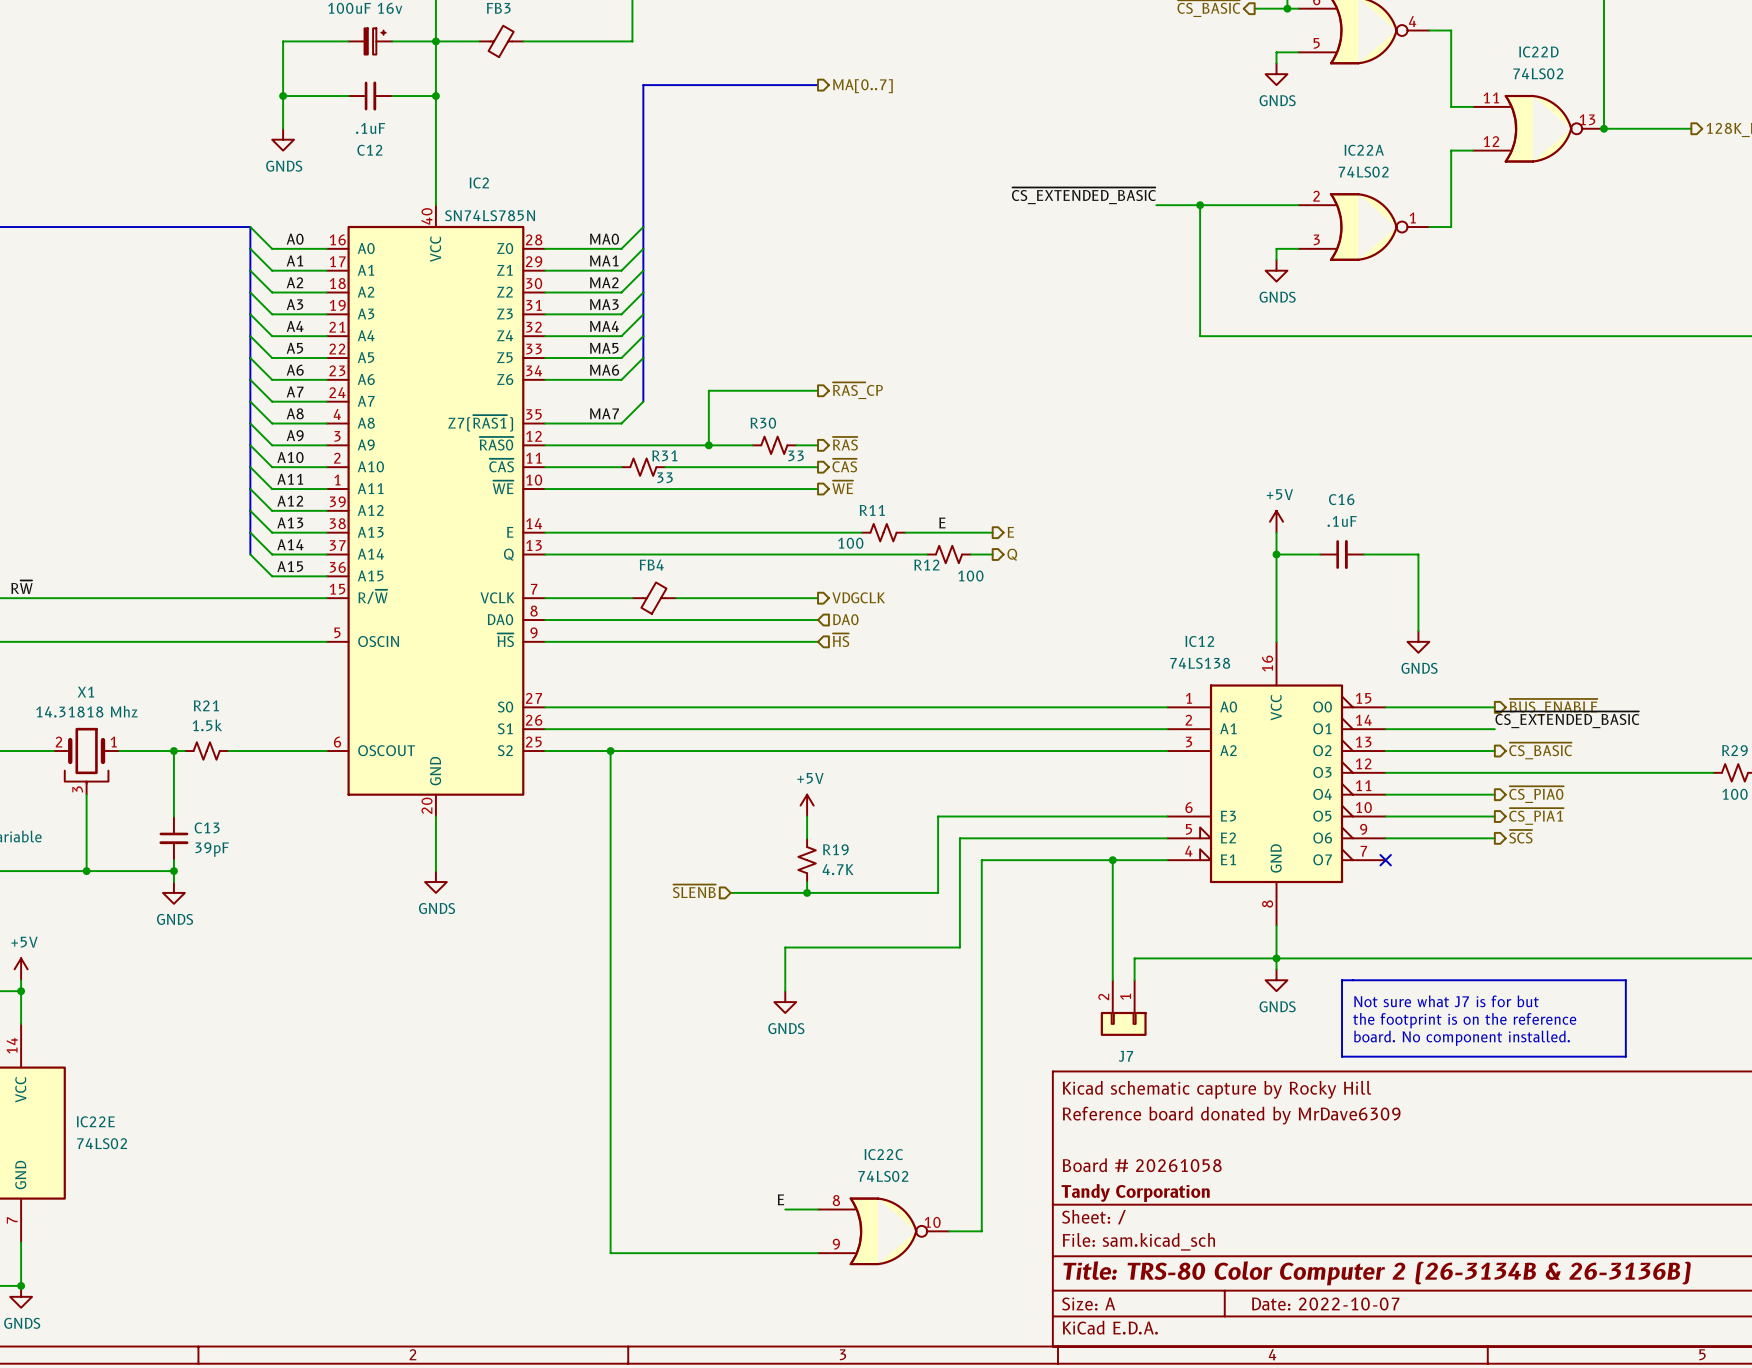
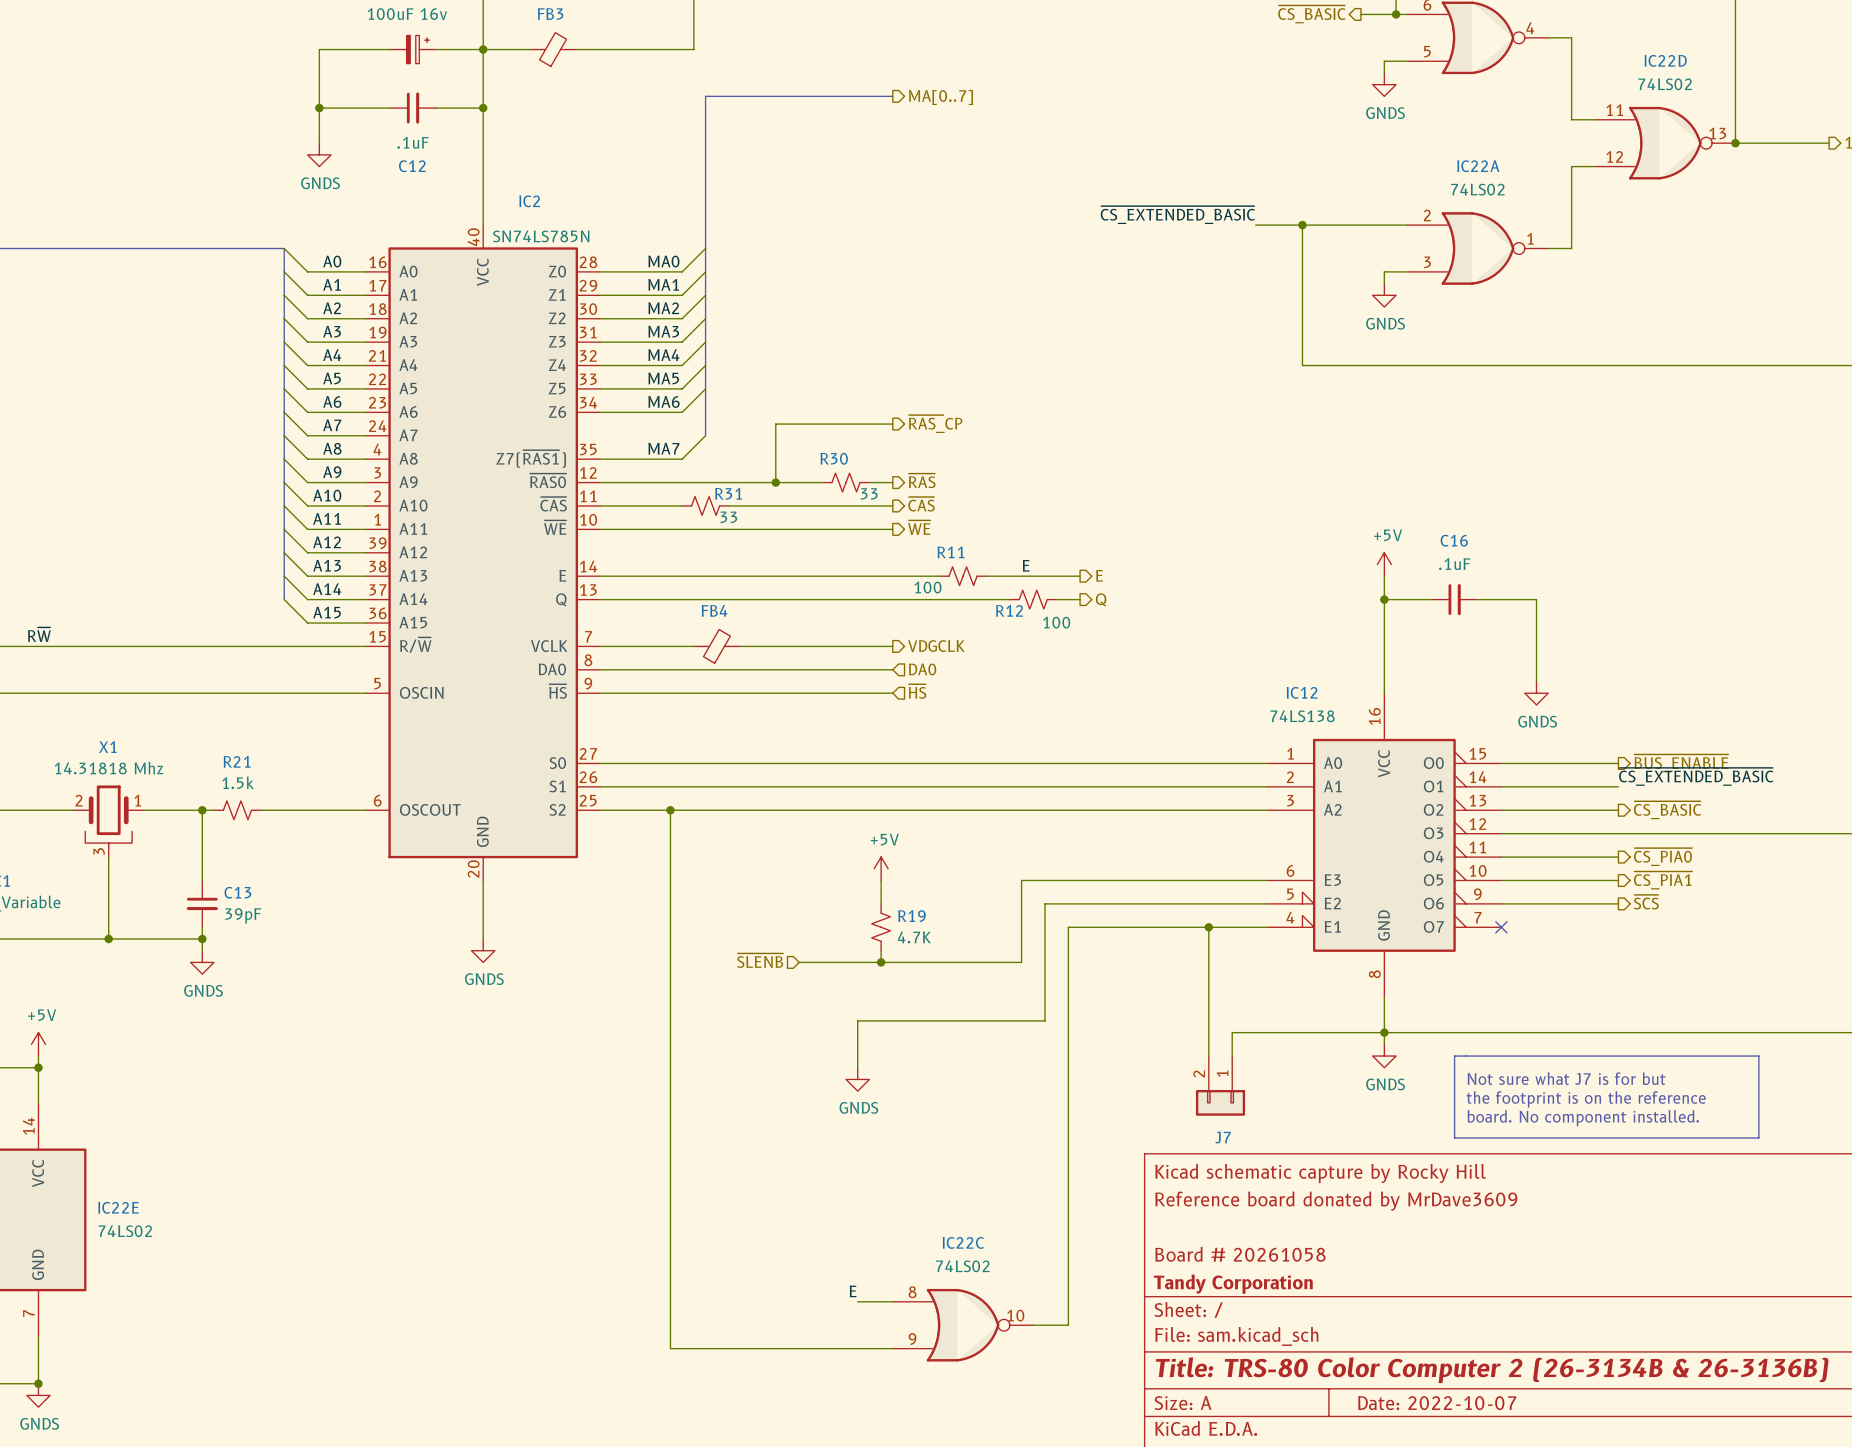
title block: Reference board donated by MrDave6309 (1231, 1115) -> Reference board donated by MrDave3609 (1336, 1201)

